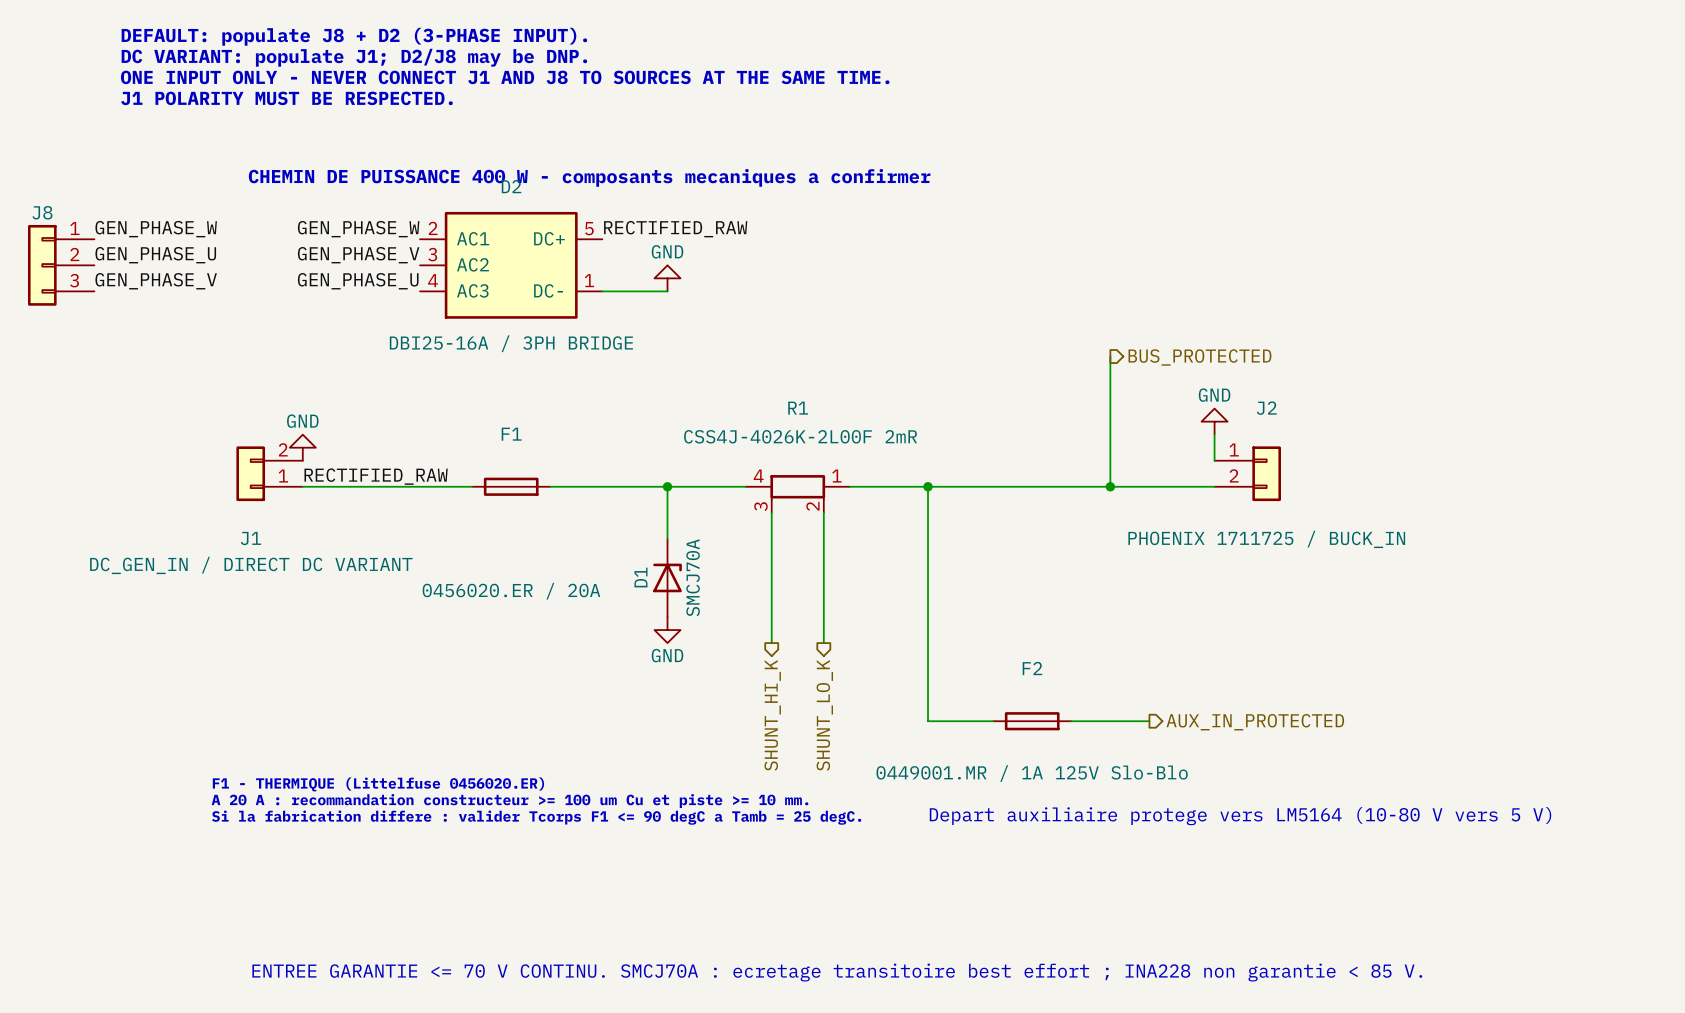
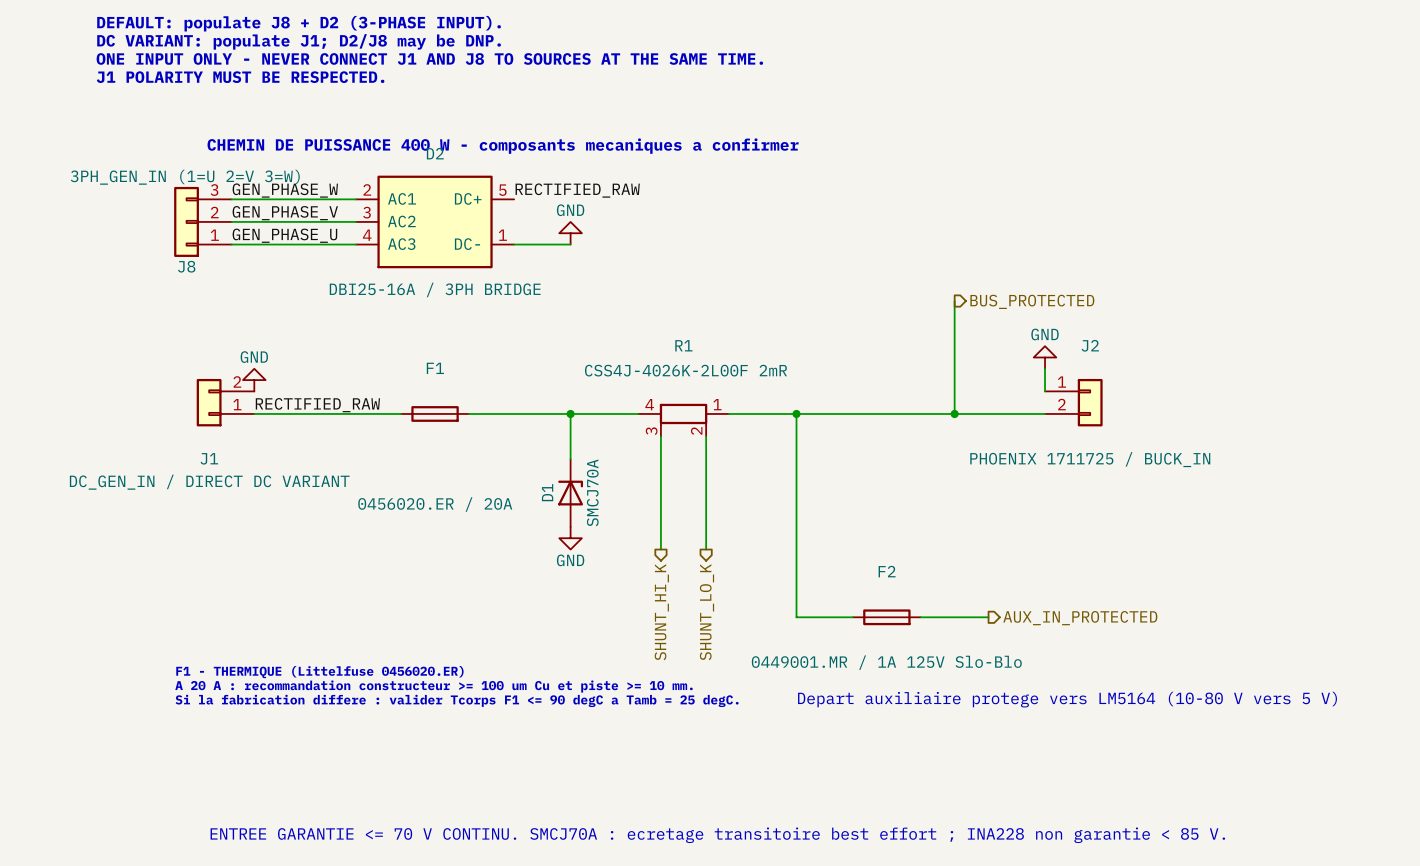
J8 value: none -> 3PH_GEN_IN (1=U 2=V 3=W) (185, 177)
label: GEN_PHASE_W (156, 229) -> none
label: none -> GEN_PHASE_W (285, 190)
label: GEN_PHASE_W (358, 229) -> none
wire: none -> (231, 199) (355, 199)
label: GEN_PHASE_U (155, 255) -> none
label: none -> GEN_PHASE_V (285, 213)
label: GEN_PHASE_V (358, 255) -> none
J8 flip: as is (42, 265) -> up-down (186, 221)
J8 position: (61, 265) -> (202, 221)
wire: none -> (231, 221) (355, 221)
label: GEN_PHASE_V (156, 281) -> none
label: none -> GEN_PHASE_U (284, 235)
label: GEN_PHASE_U (358, 281) -> none
wire: none -> (231, 244) (355, 244)

